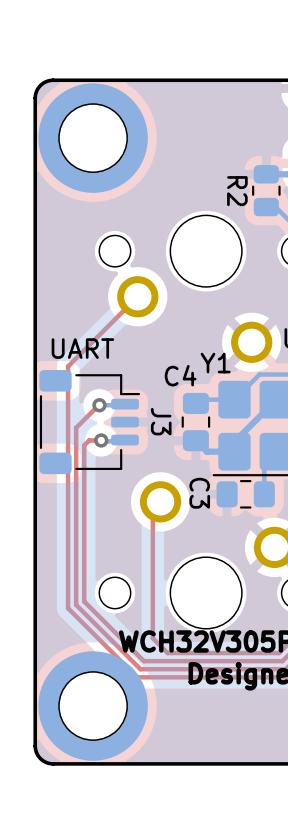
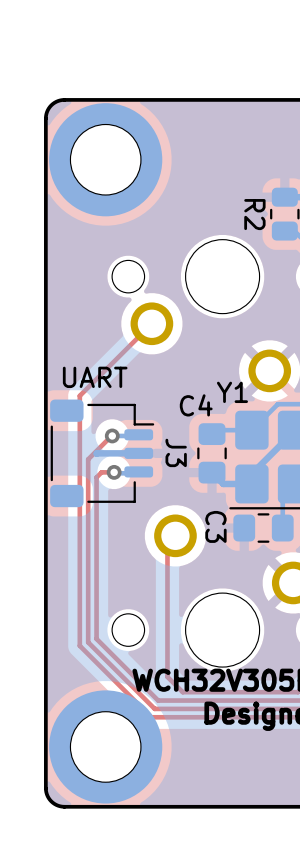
bottom track: none -> (138, 453) (96, 453)

